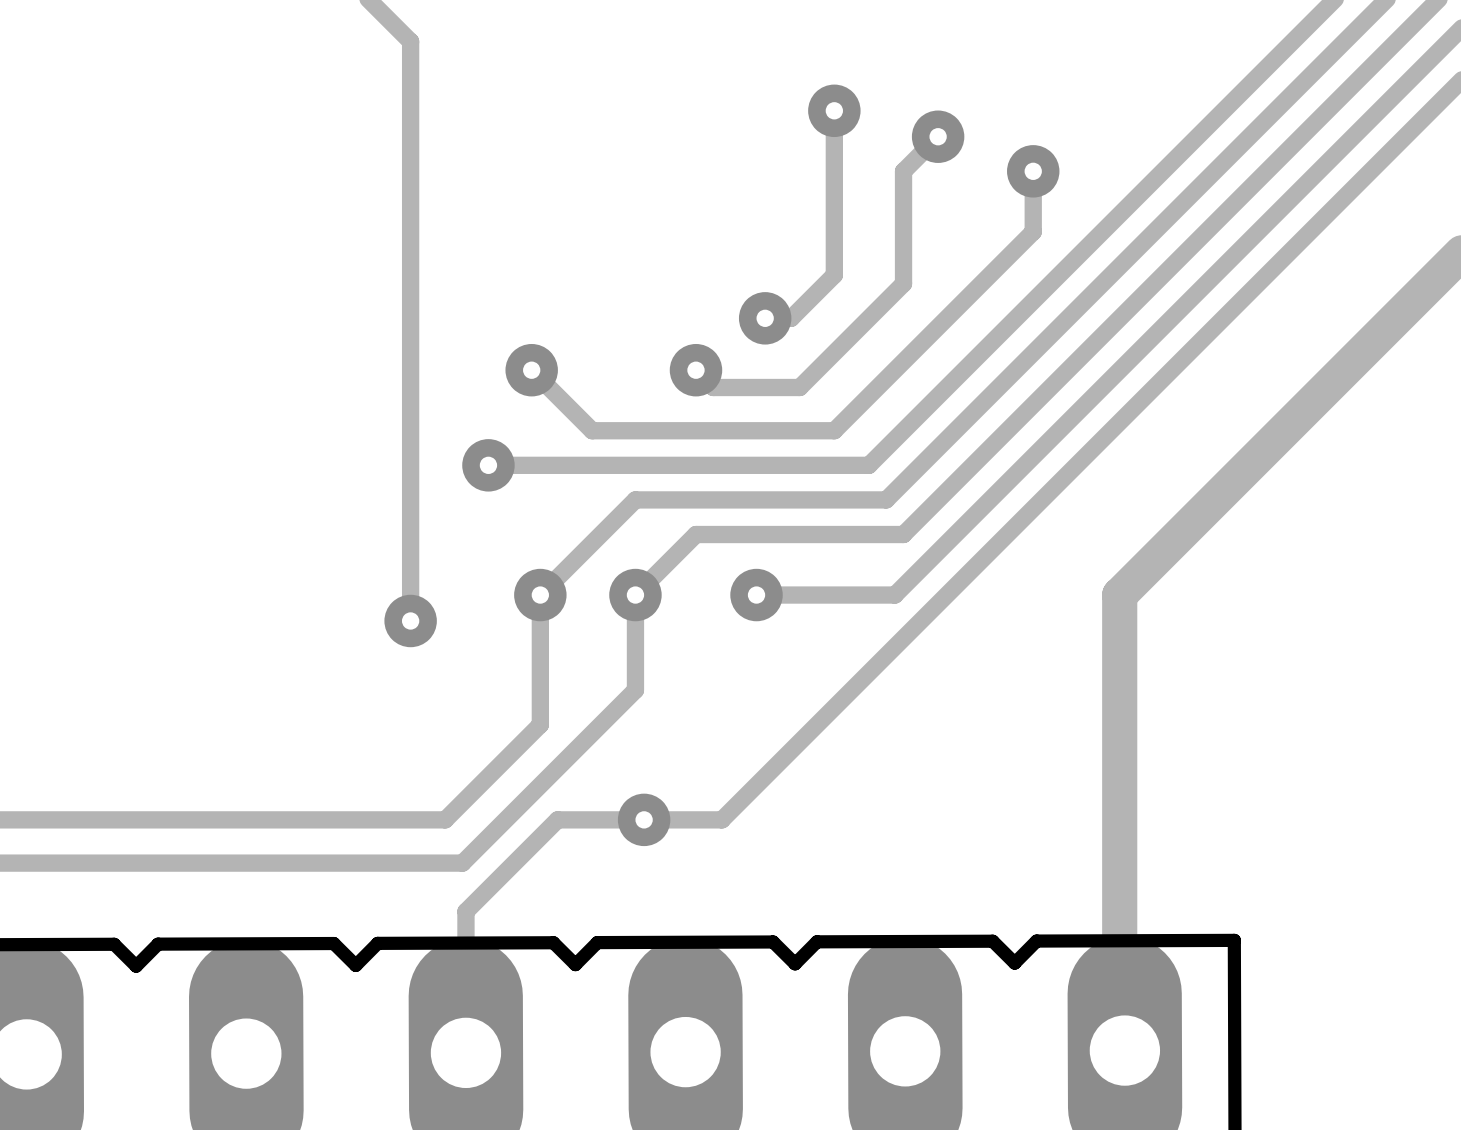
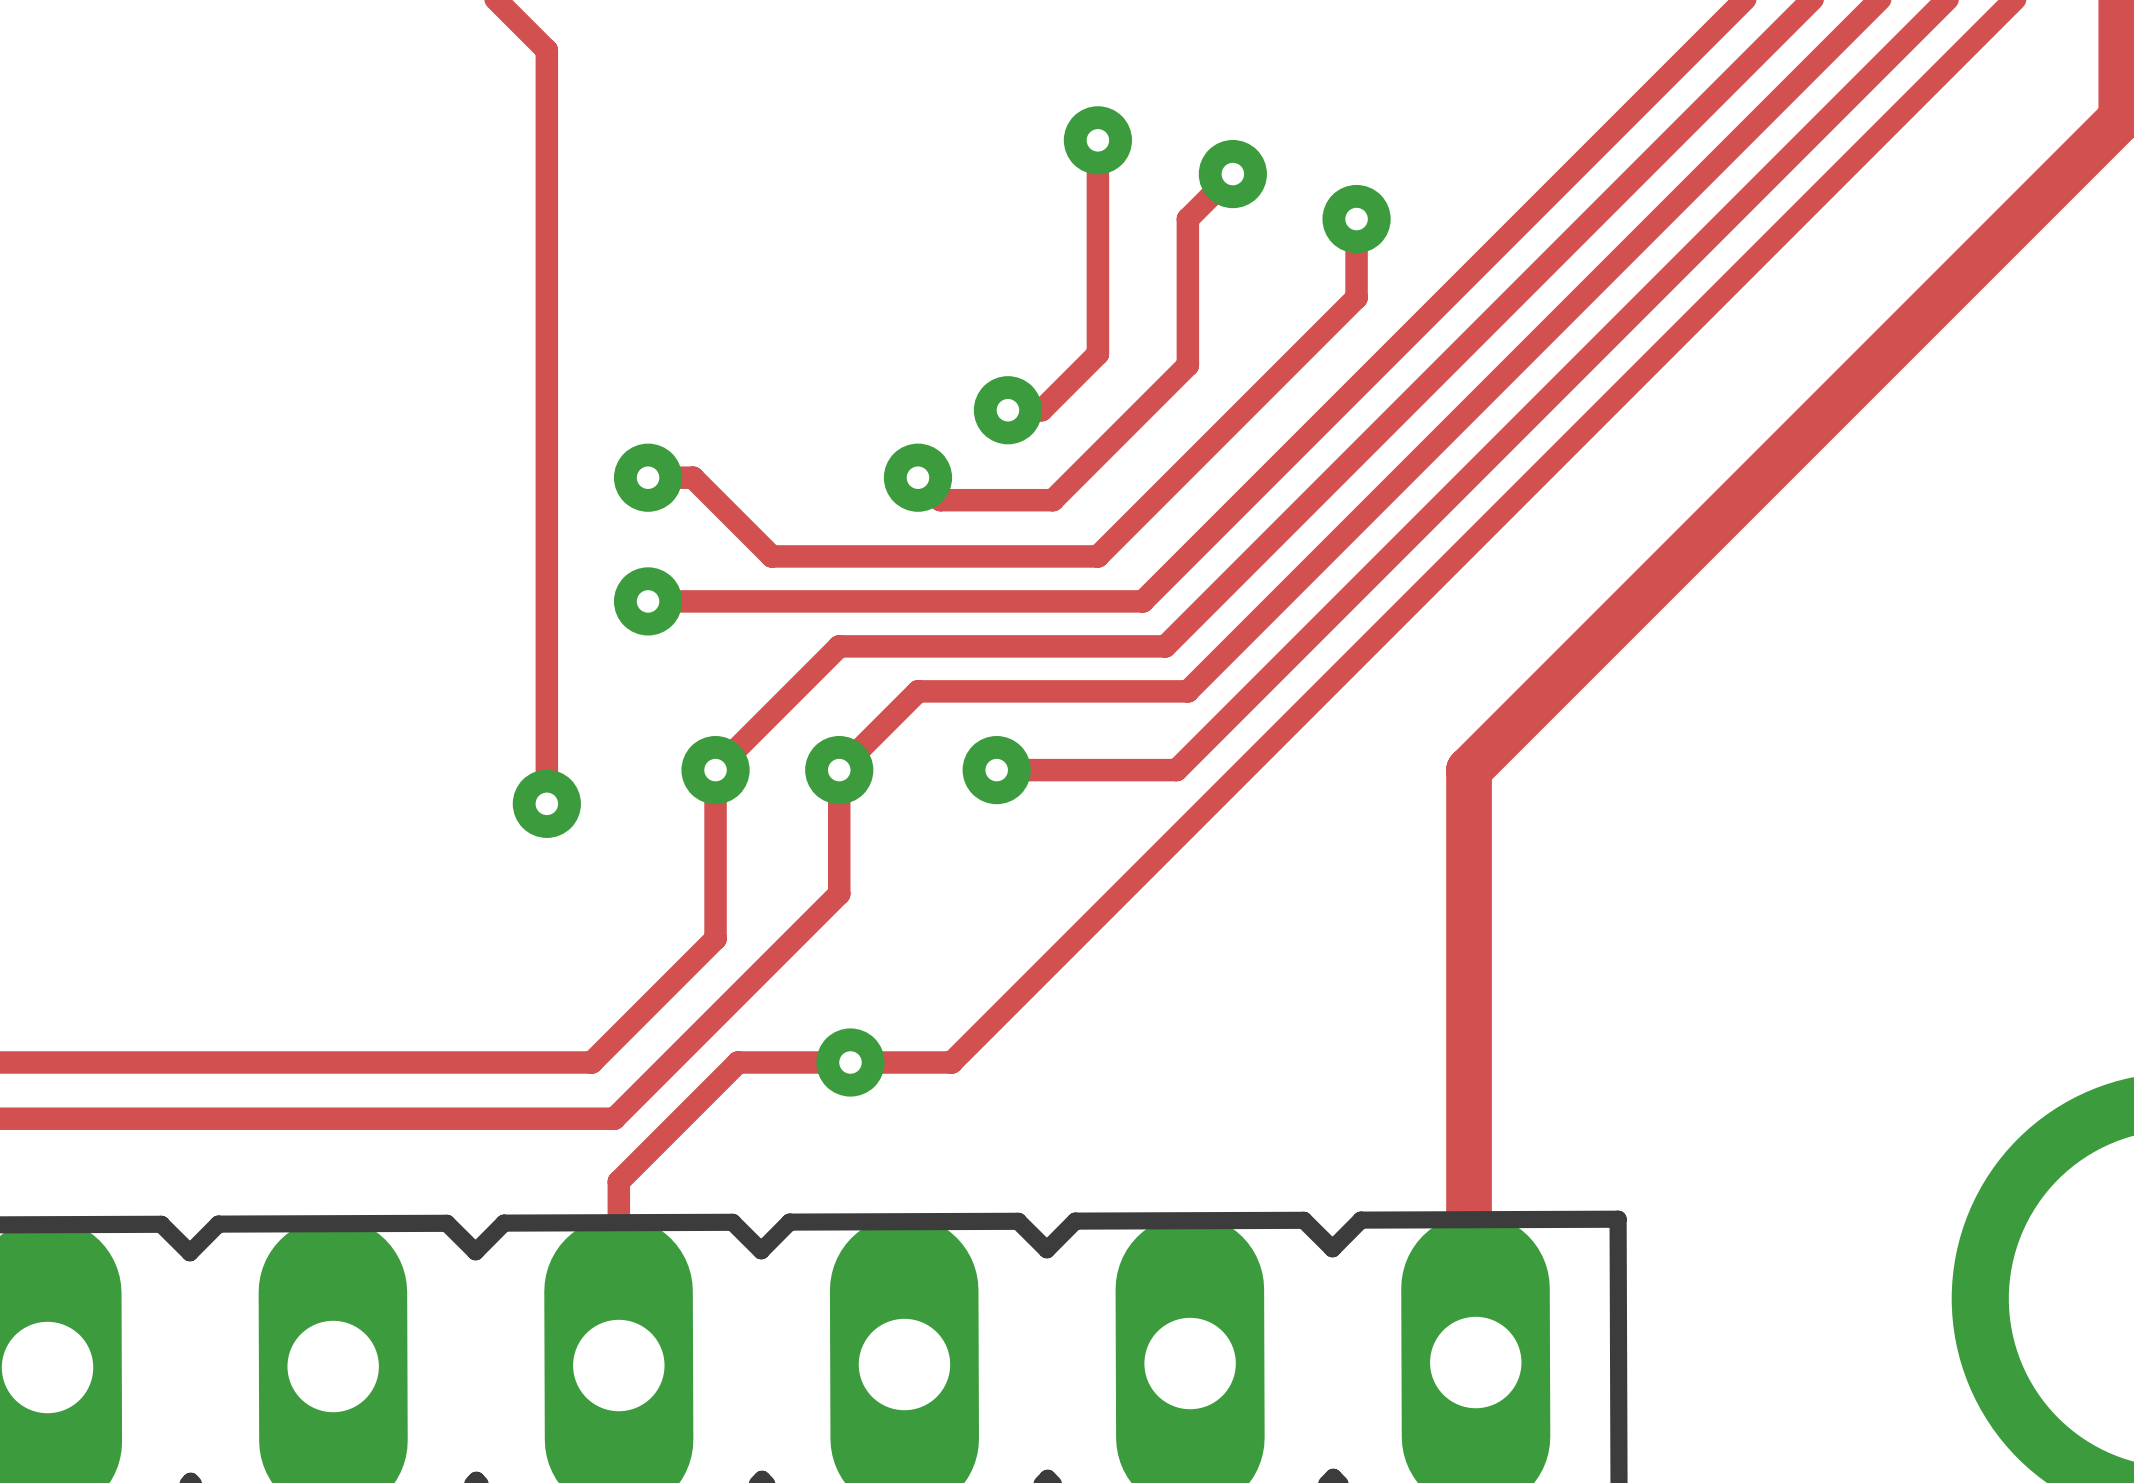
track: (531, 370) (592, 430) -> (648, 477) (693, 477) (771, 556) (783, 556)
via position: (531, 370) -> (648, 477)

